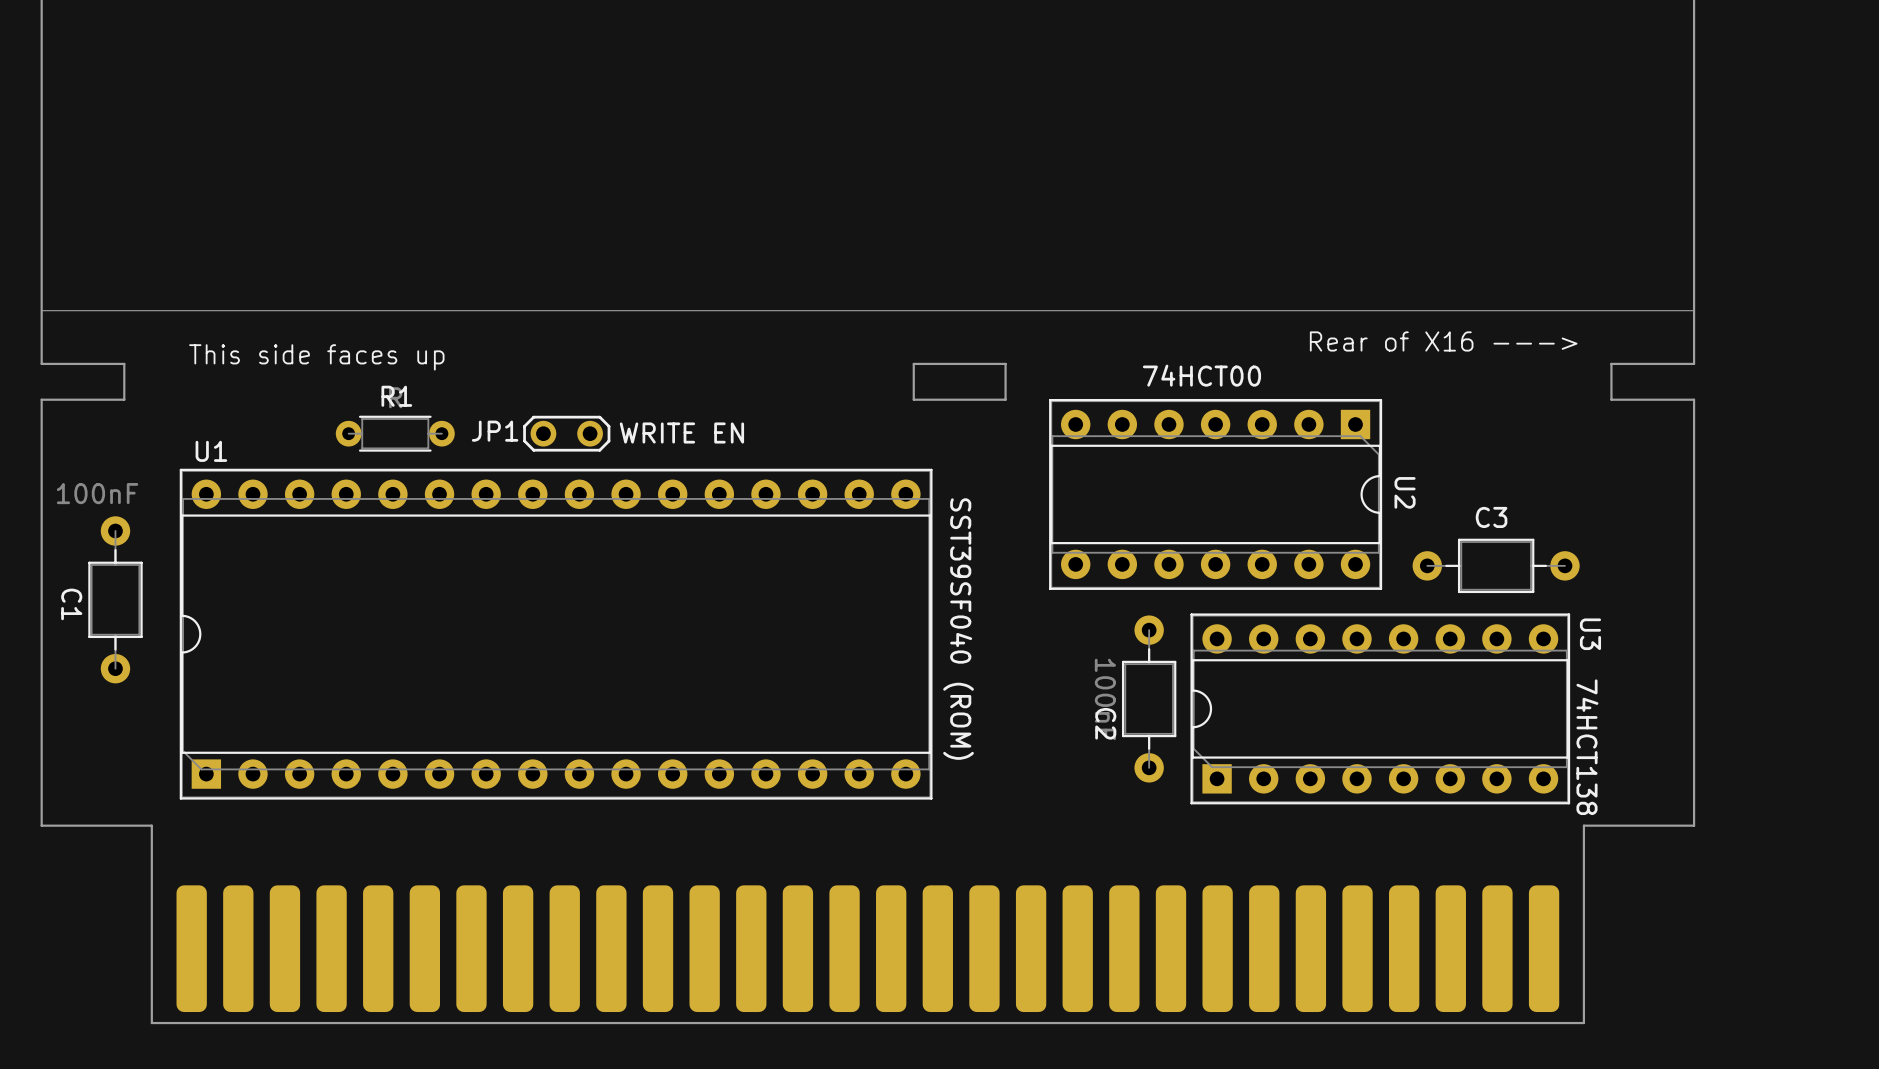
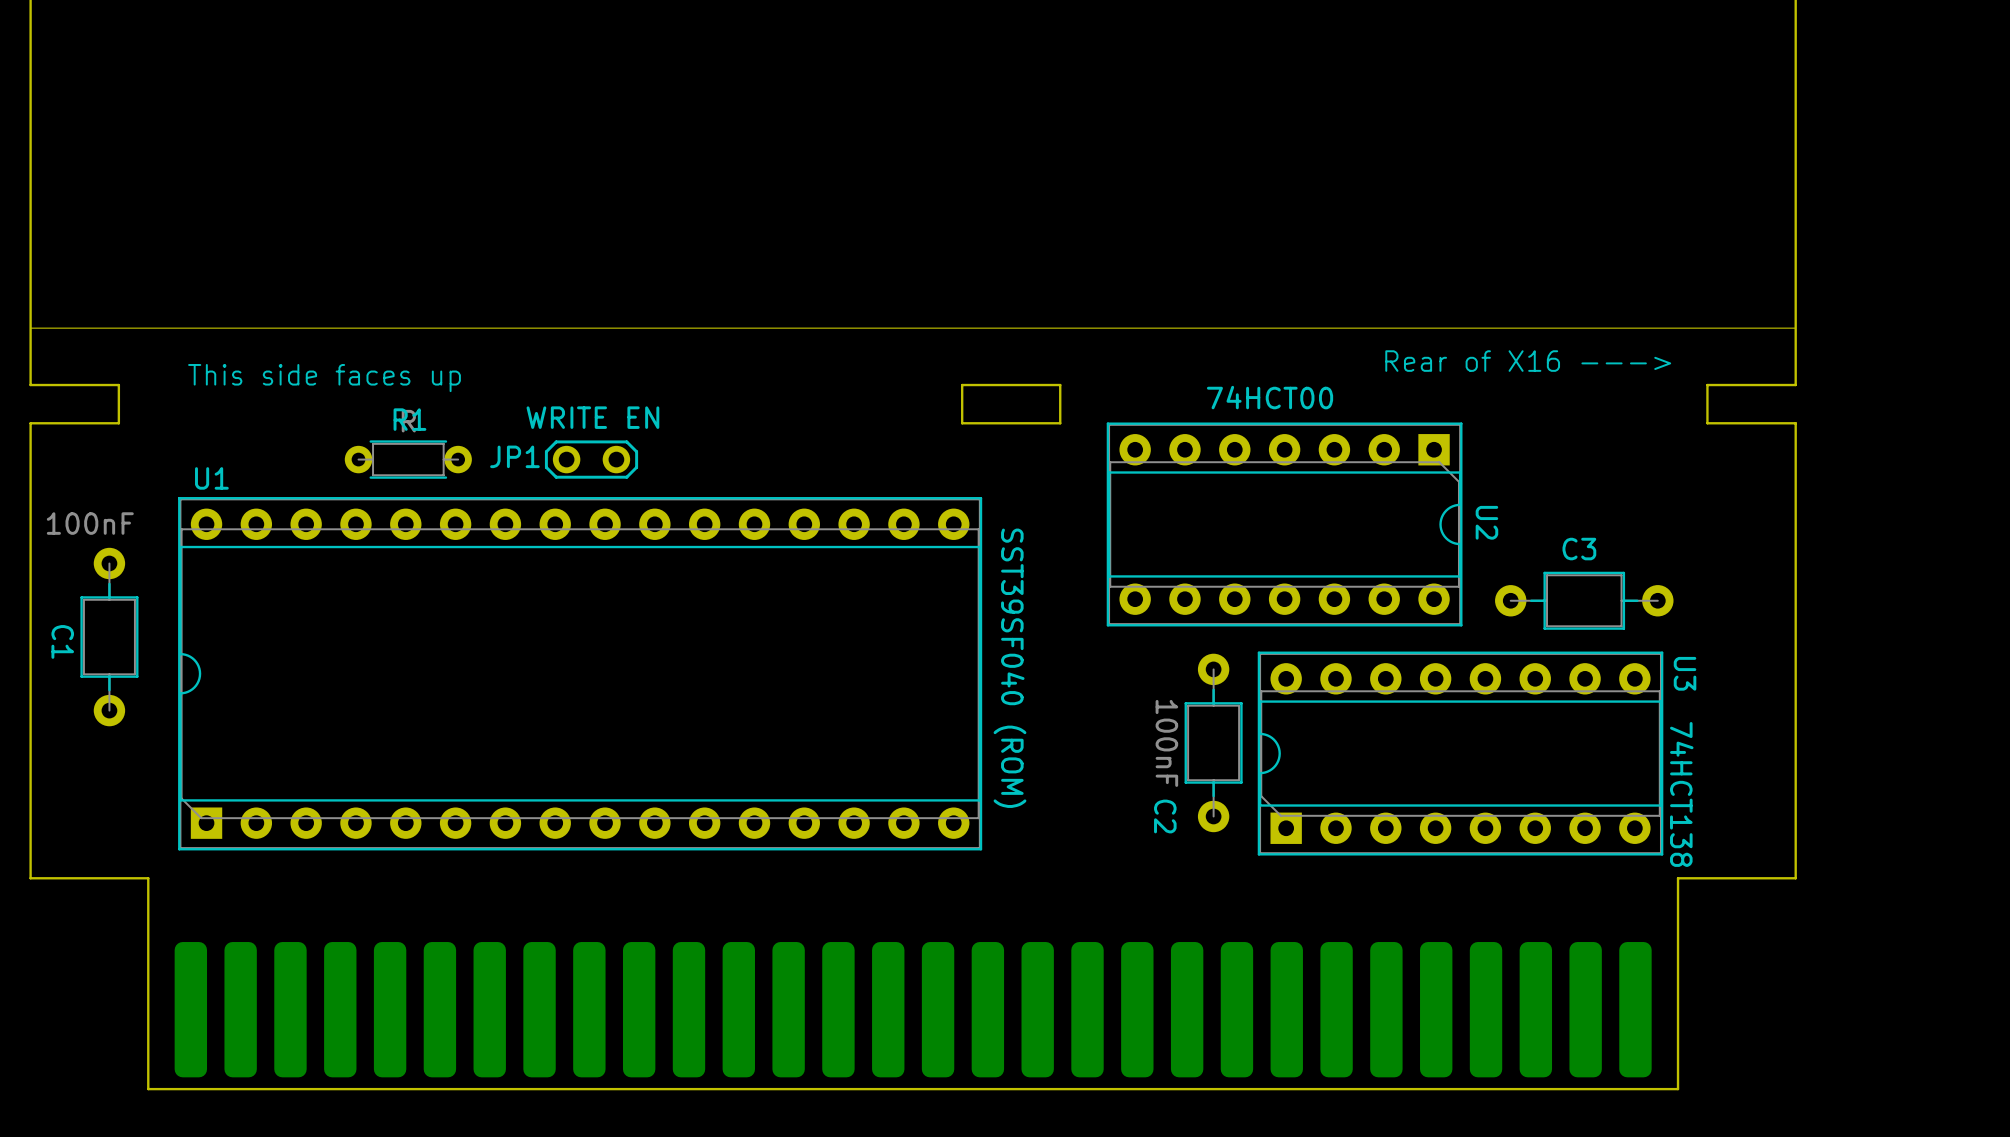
JP1 value position: WRITE EN (681, 433) -> WRITE EN (592, 417)
C2 name position: C2 (1105, 723) -> C2 (1165, 816)

